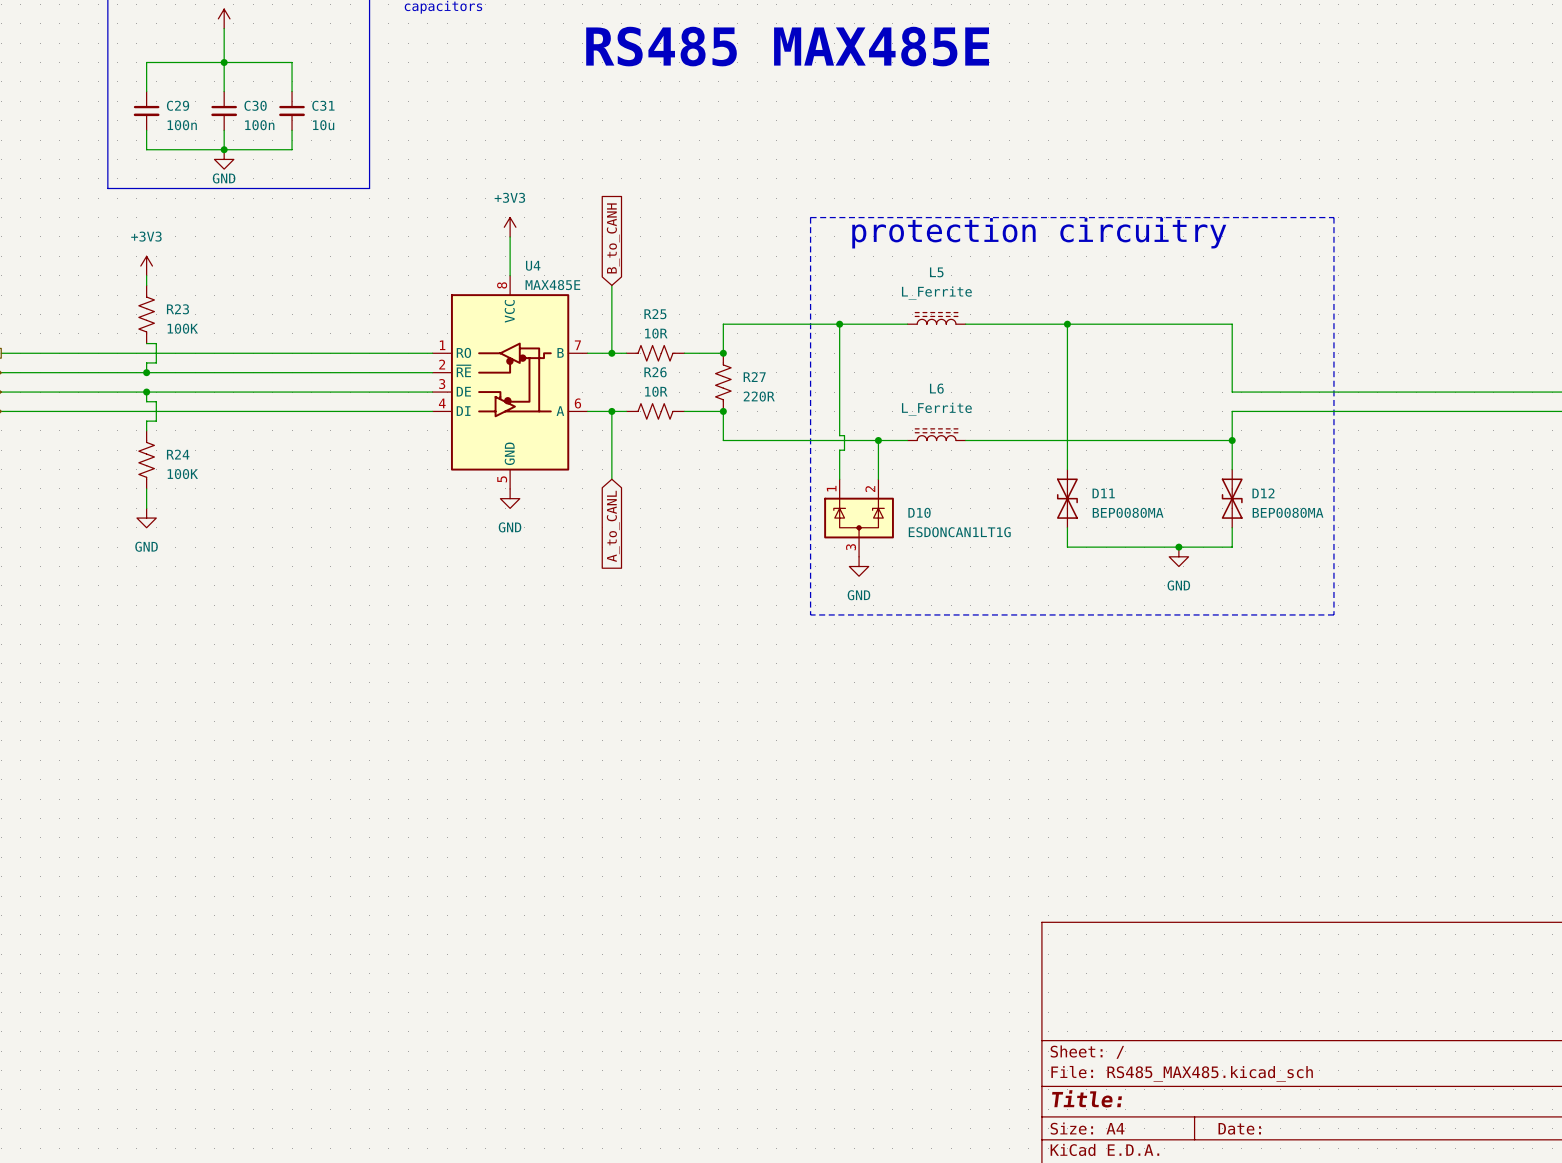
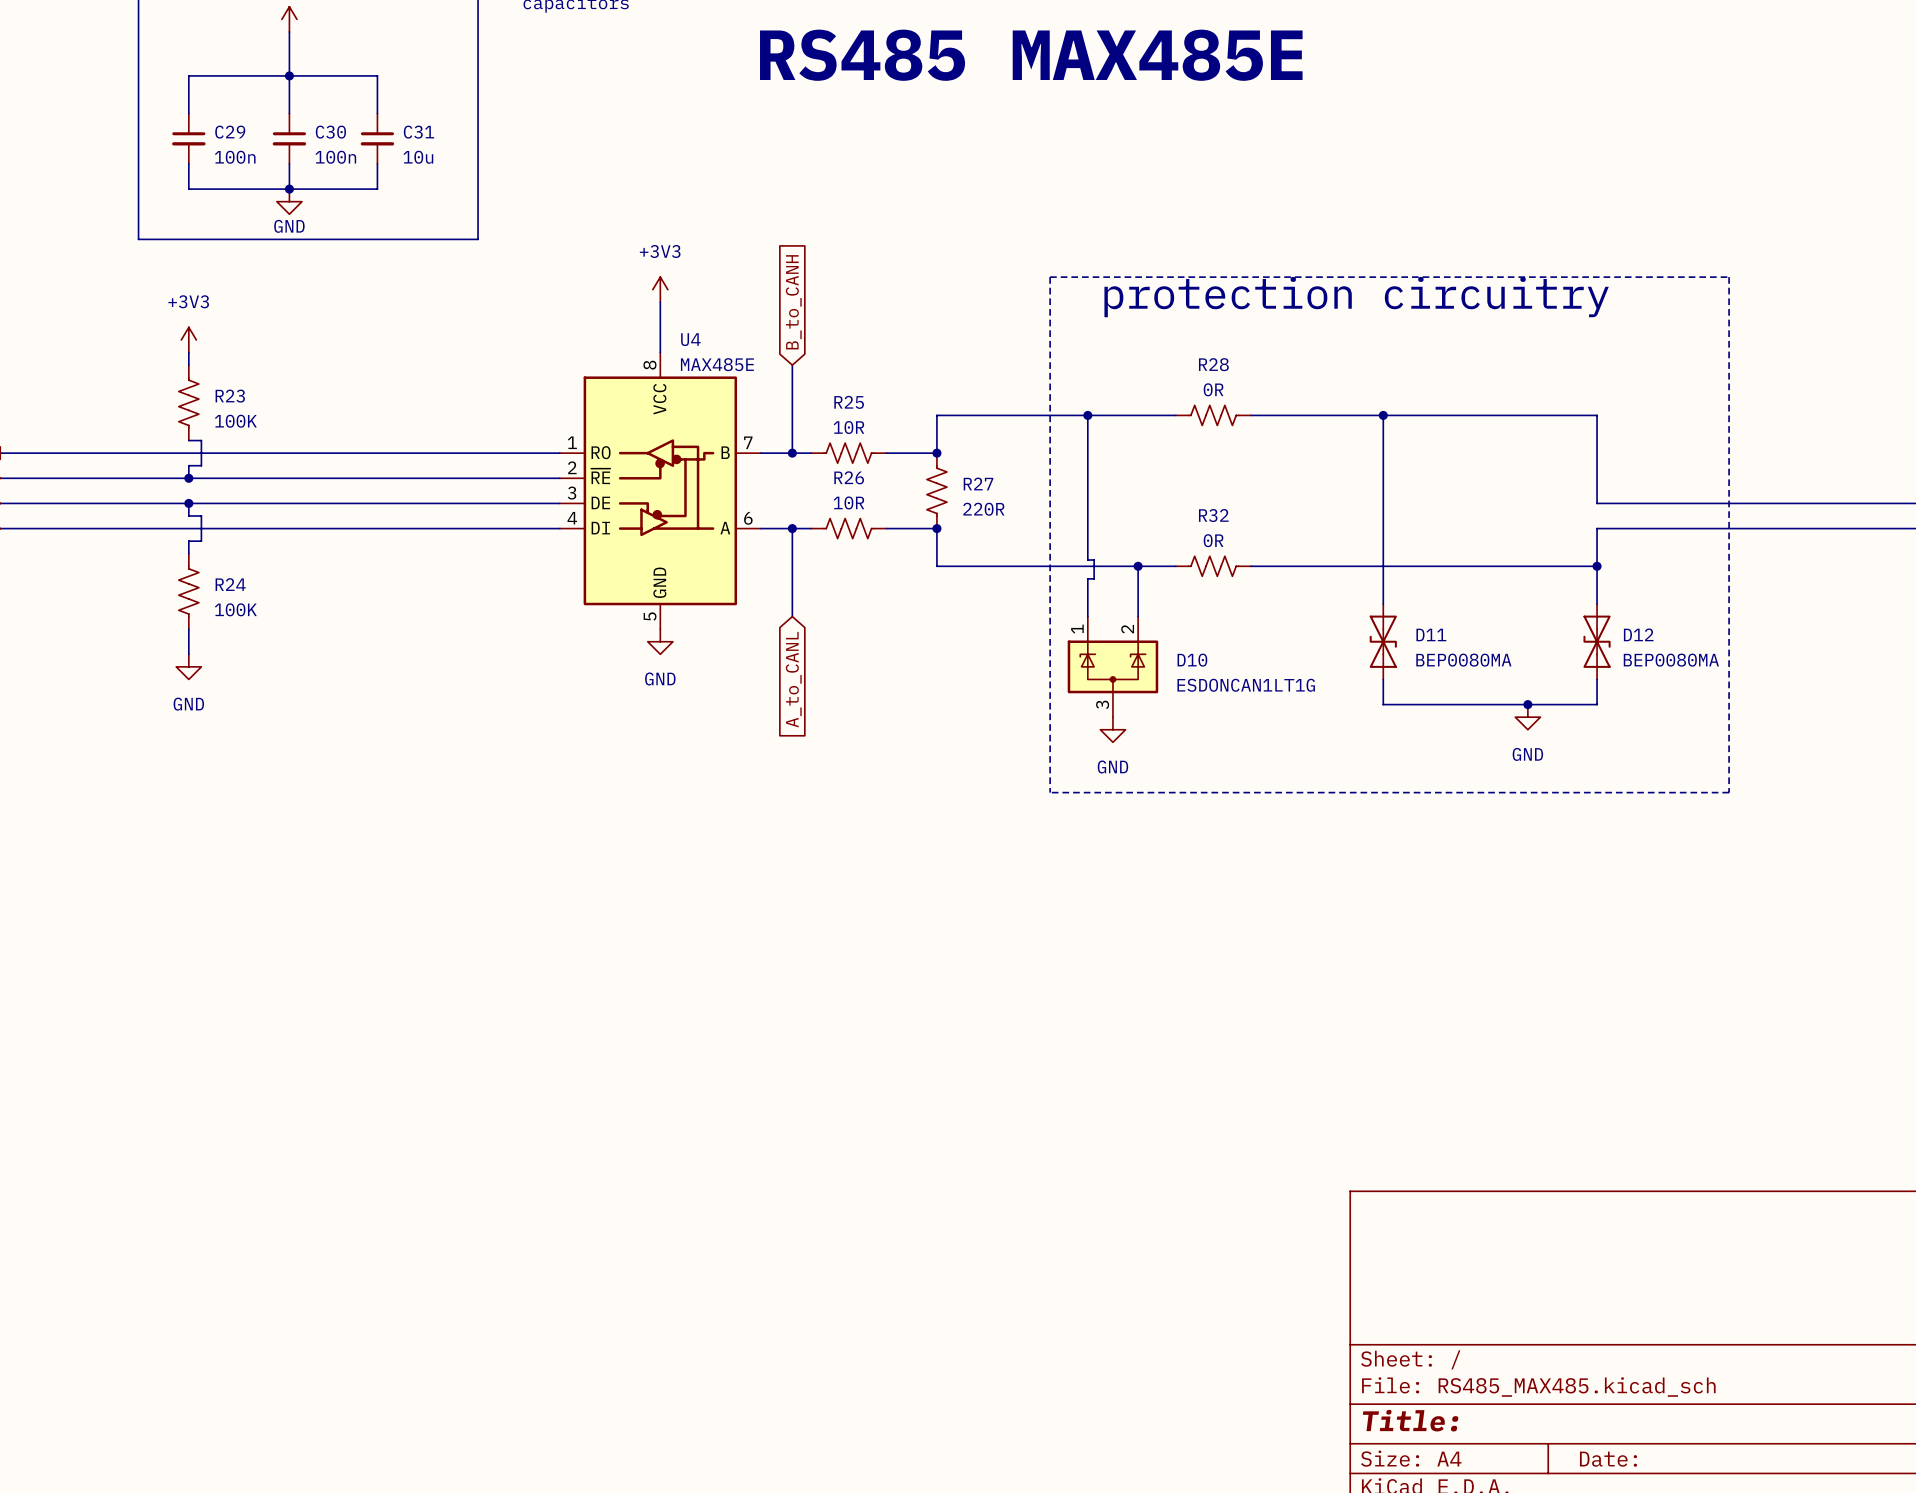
L5: L_Ferrite (936, 318) -> none
R28: none -> 0R (1213, 415)
L6: L_Ferrite (936, 434) -> none
R32: none -> 0R (1213, 566)

